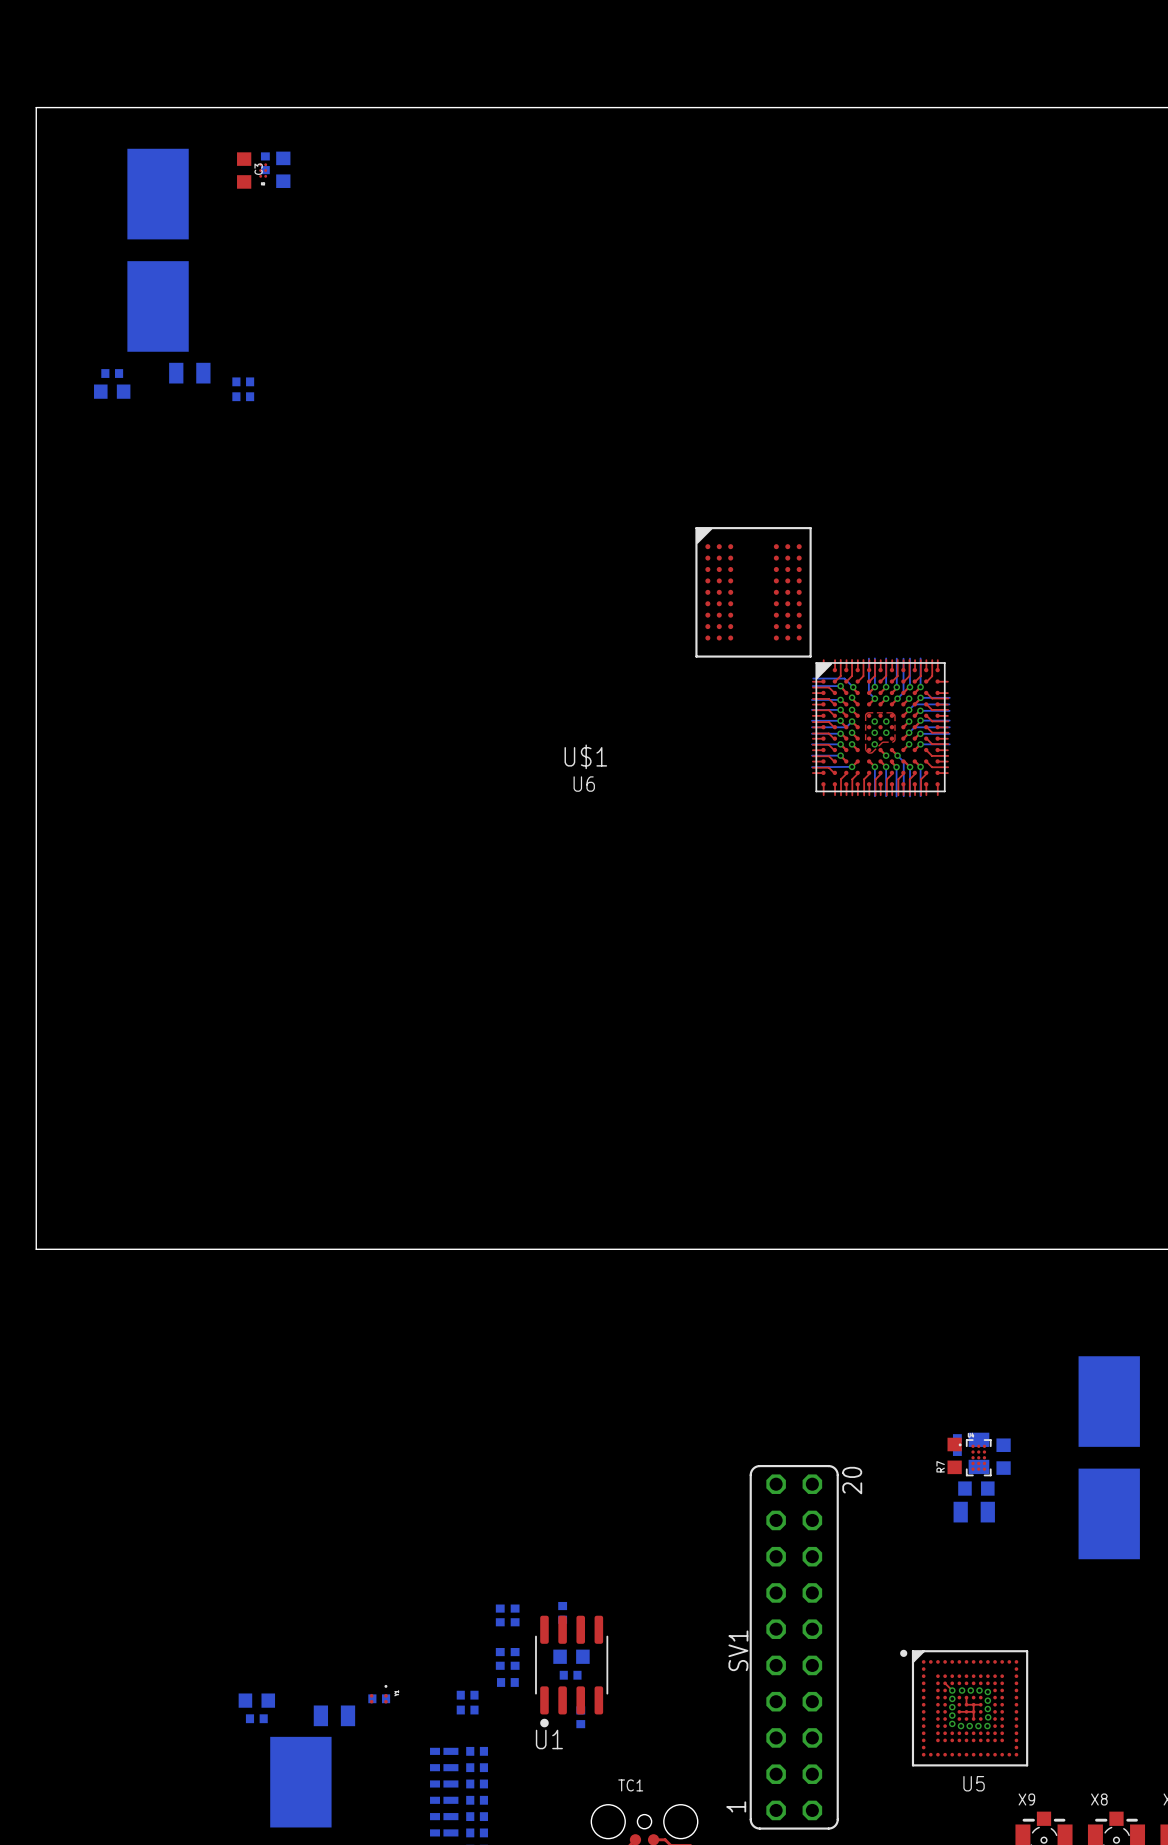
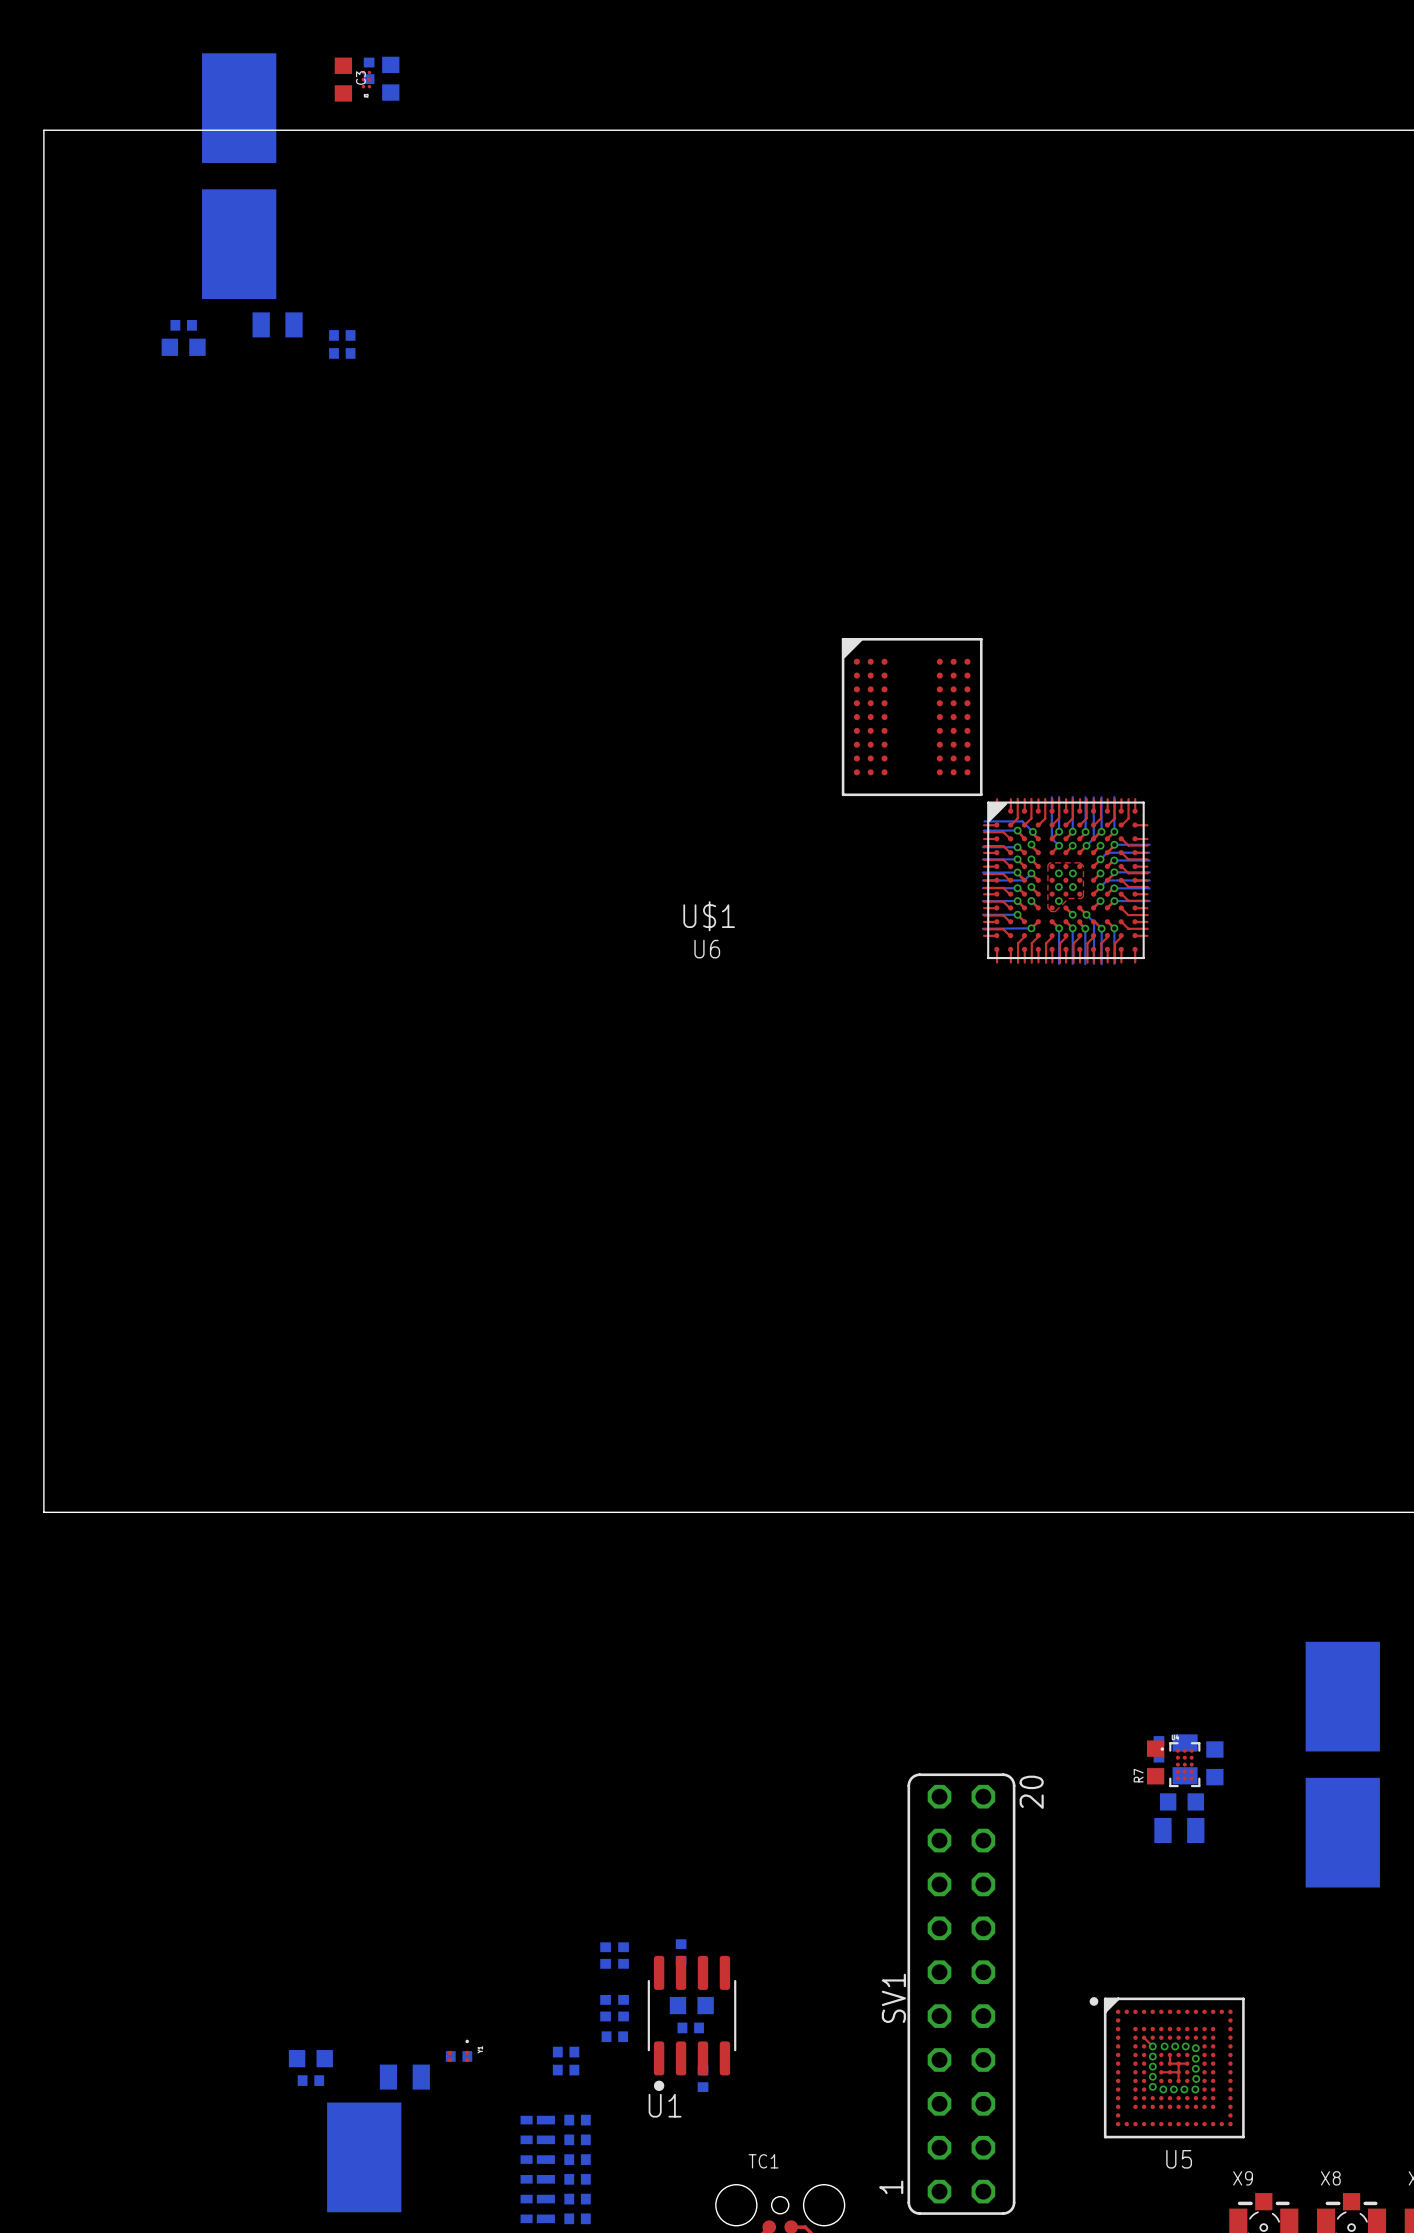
part: none -> (369, 70)
part: none -> (390, 78)
part: (265, 163) -> none
part: (283, 169) -> none
C3 position: (244, 170) -> (343, 79)
part position: (263, 170) -> (366, 79)
part position: (158, 250) -> (239, 176)
part: none -> (183, 325)
part: none -> (342, 335)
part: none -> (183, 347)
part: none -> (342, 353)
part: (112, 373) -> none
part position: (189, 373) -> (277, 324)
part: (243, 381) -> none
part: (112, 391) -> none
part: (243, 396) -> none

